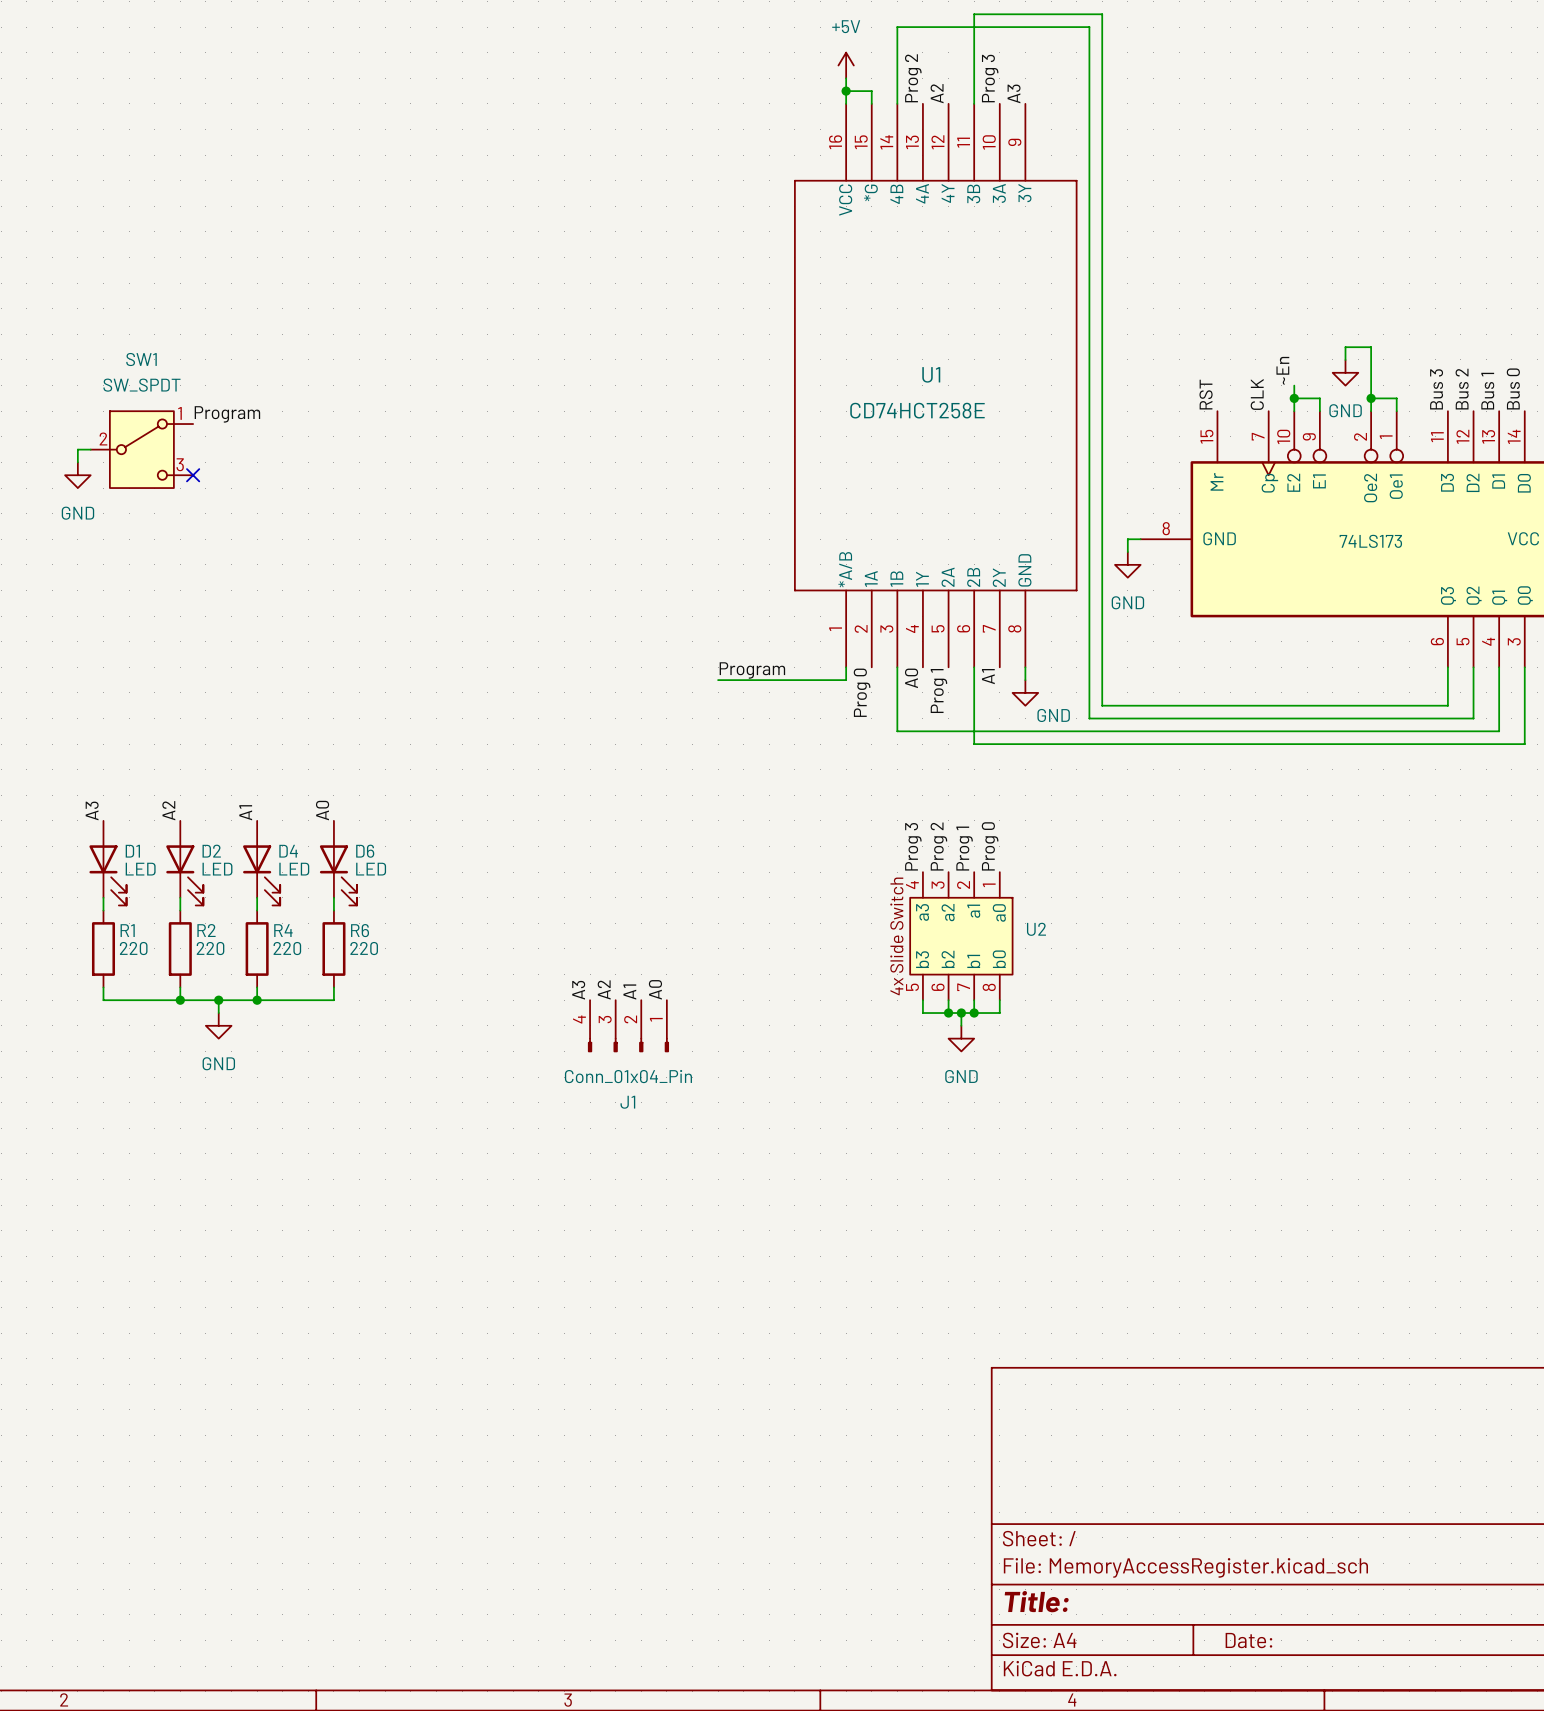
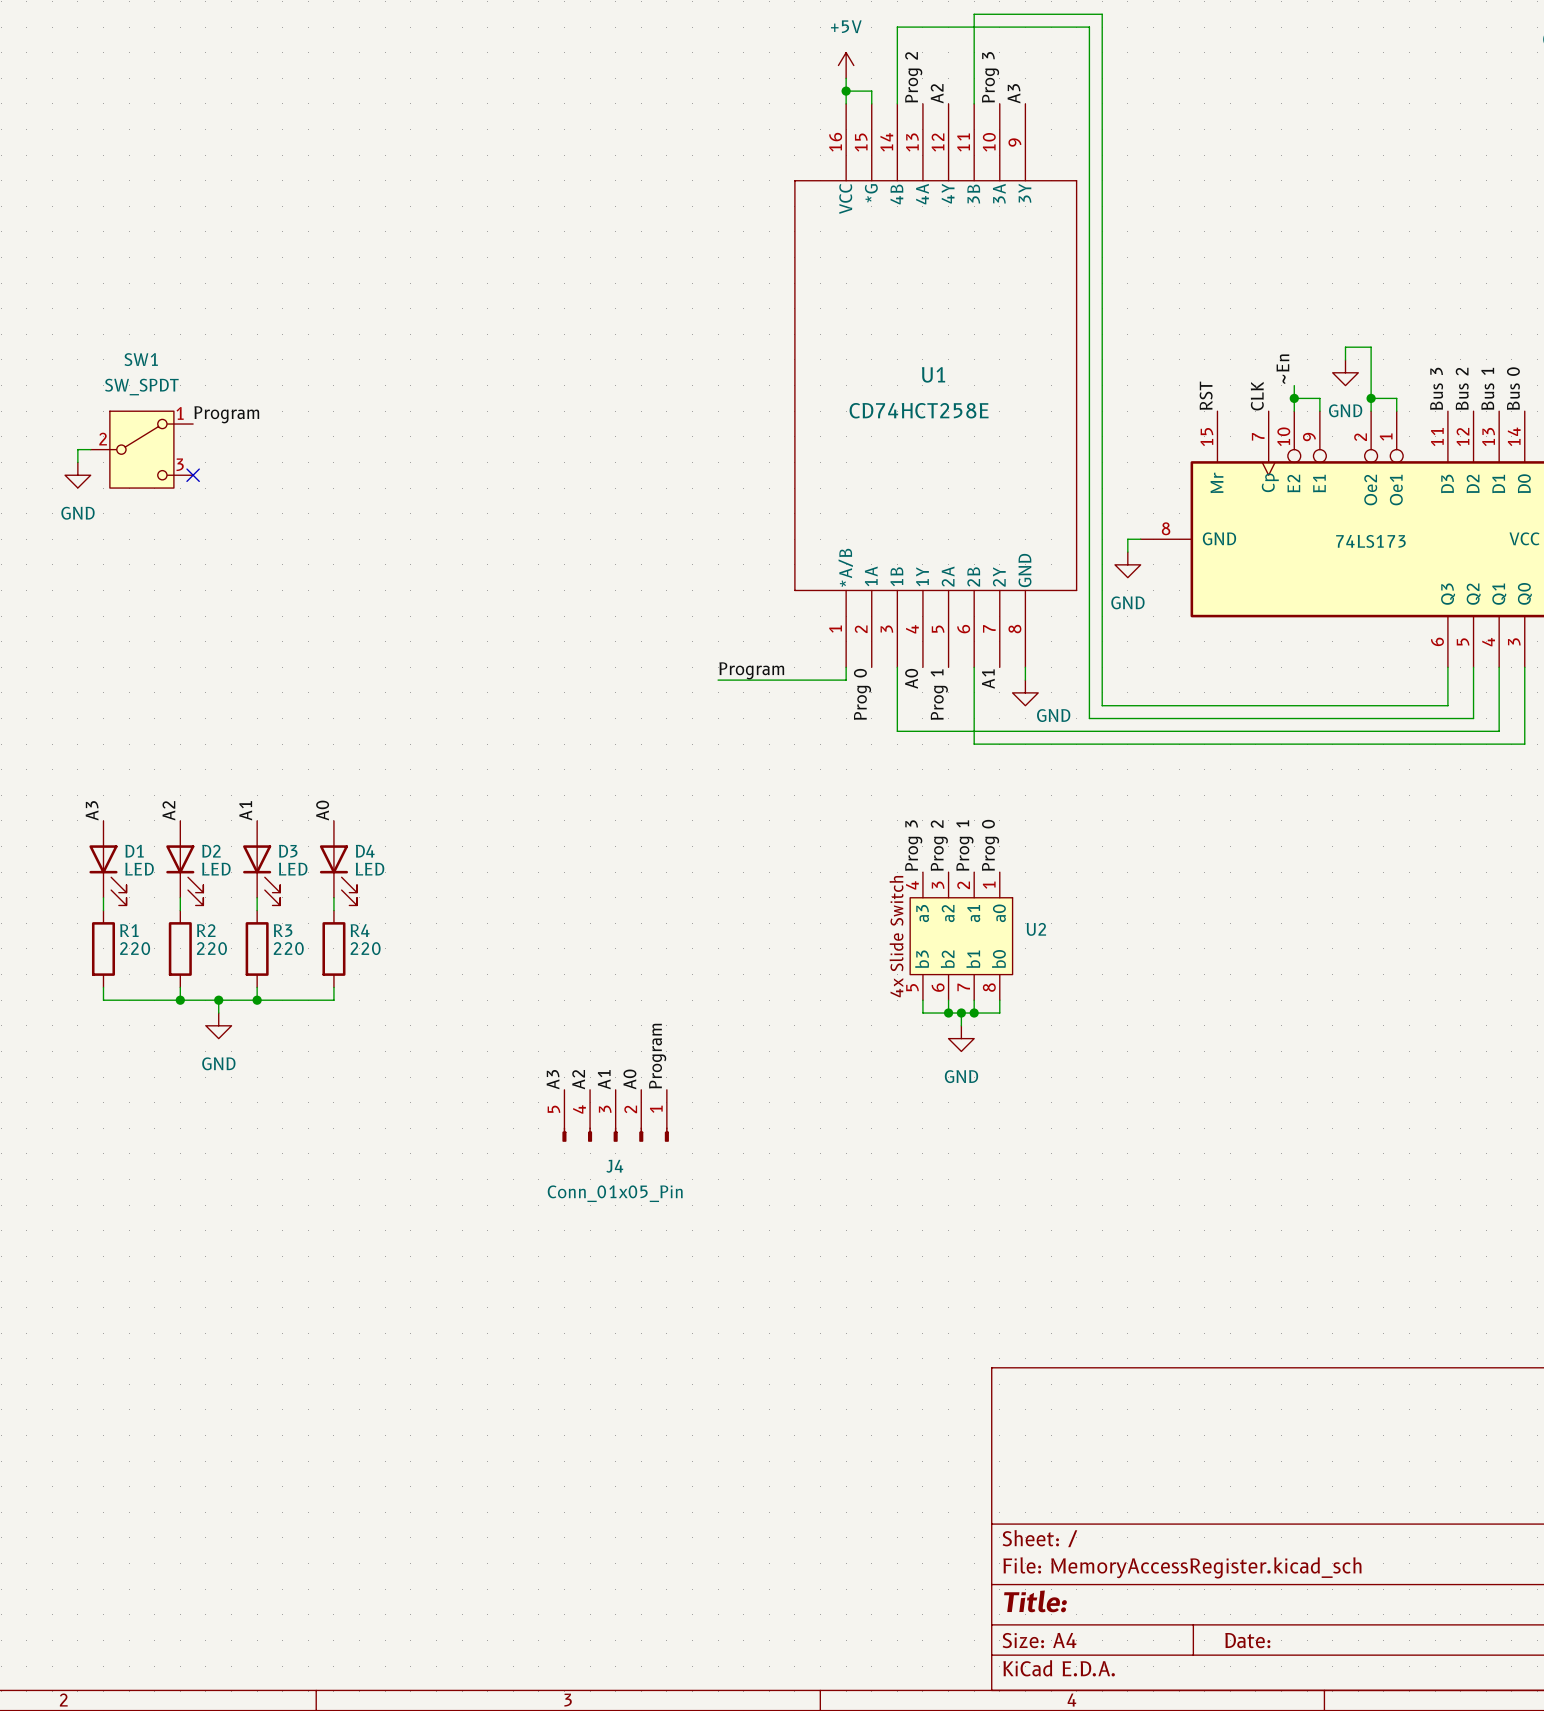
D4 name: D4 (288, 851) -> D3 (288, 851)
D6 name: D6 (365, 851) -> D4 (365, 851)
R4 name: R4 (283, 930) -> R3 (283, 930)
R6 name: R6 (360, 930) -> R4 (360, 930)
label position: A2 (604, 989) -> A2 (578, 1079)
label position: A0 (655, 989) -> A0 (629, 1079)
label position: A3 (578, 990) -> A3 (553, 1079)
label position: A1 (629, 992) -> A1 (604, 1079)
J1: Conn_01x04_Pin (628, 1026) -> none
label: none -> Program (657, 1056)
J4: none -> Conn_01x05_Pin (615, 1115)

